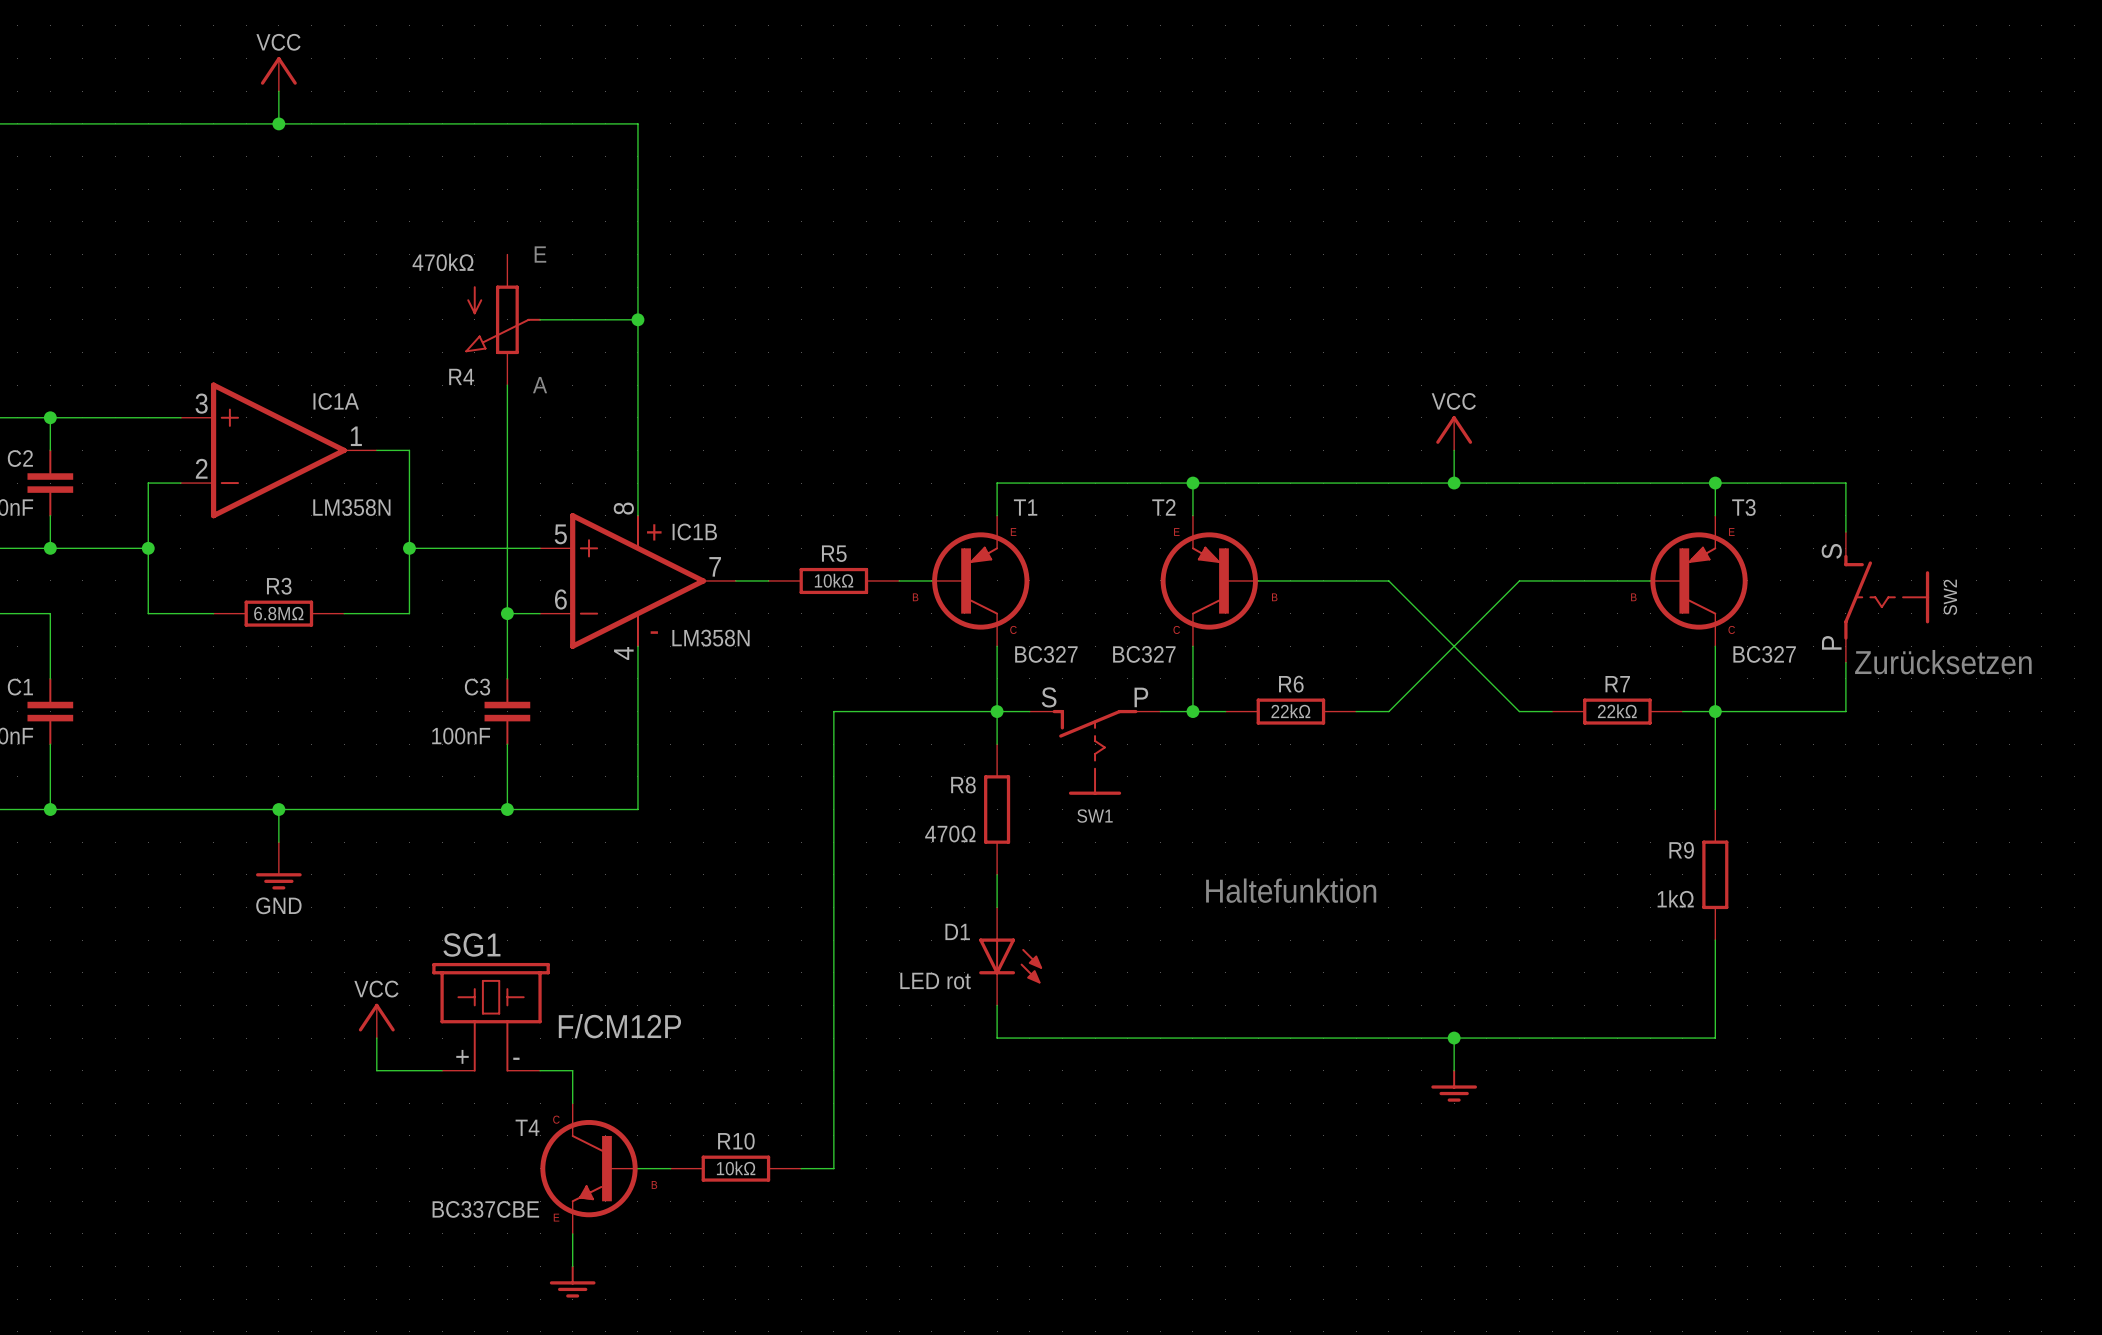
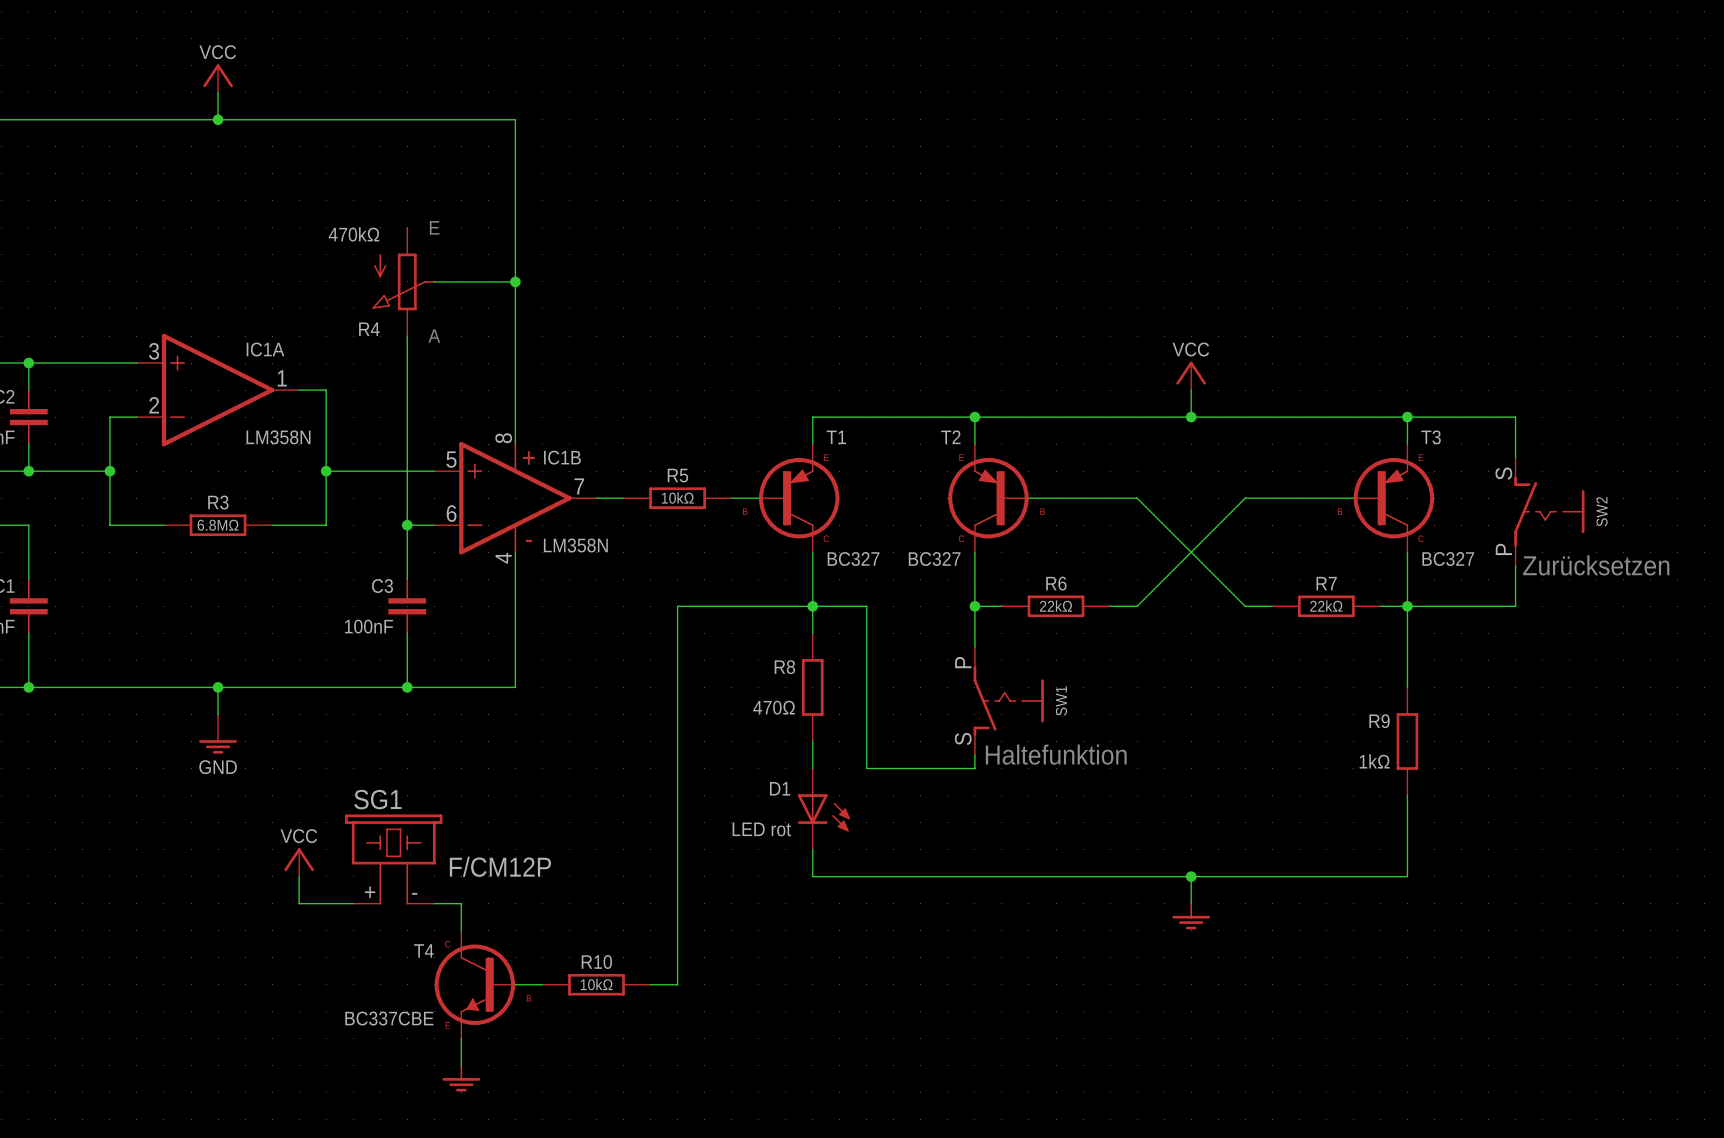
wire: none -> (839, 606) (866, 606) (866, 768) (974, 768) (974, 754)
wire: (1160, 711) (1192, 711) -> (974, 646) (974, 606)
SW1 rotation: 0° (1095, 752) -> 90° counterclockwise (1008, 700)
SW1 position: (1095, 752) -> (1008, 700)

